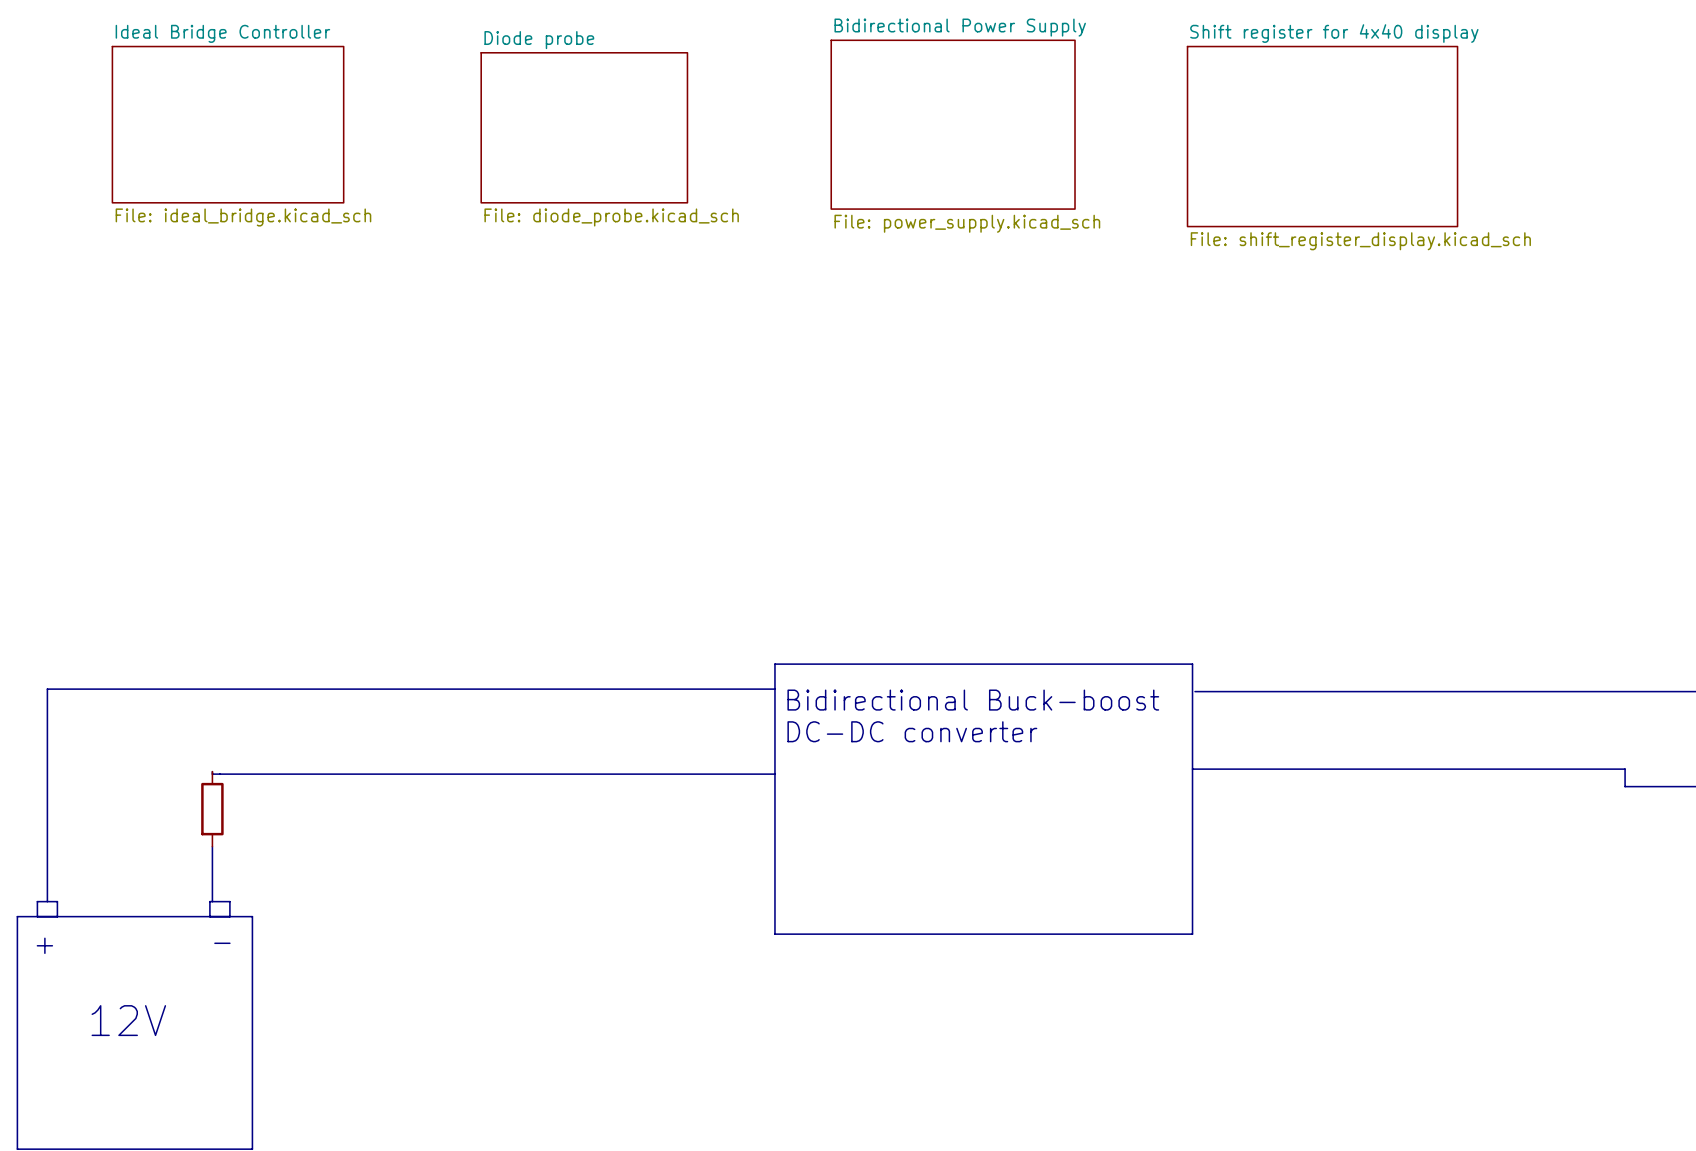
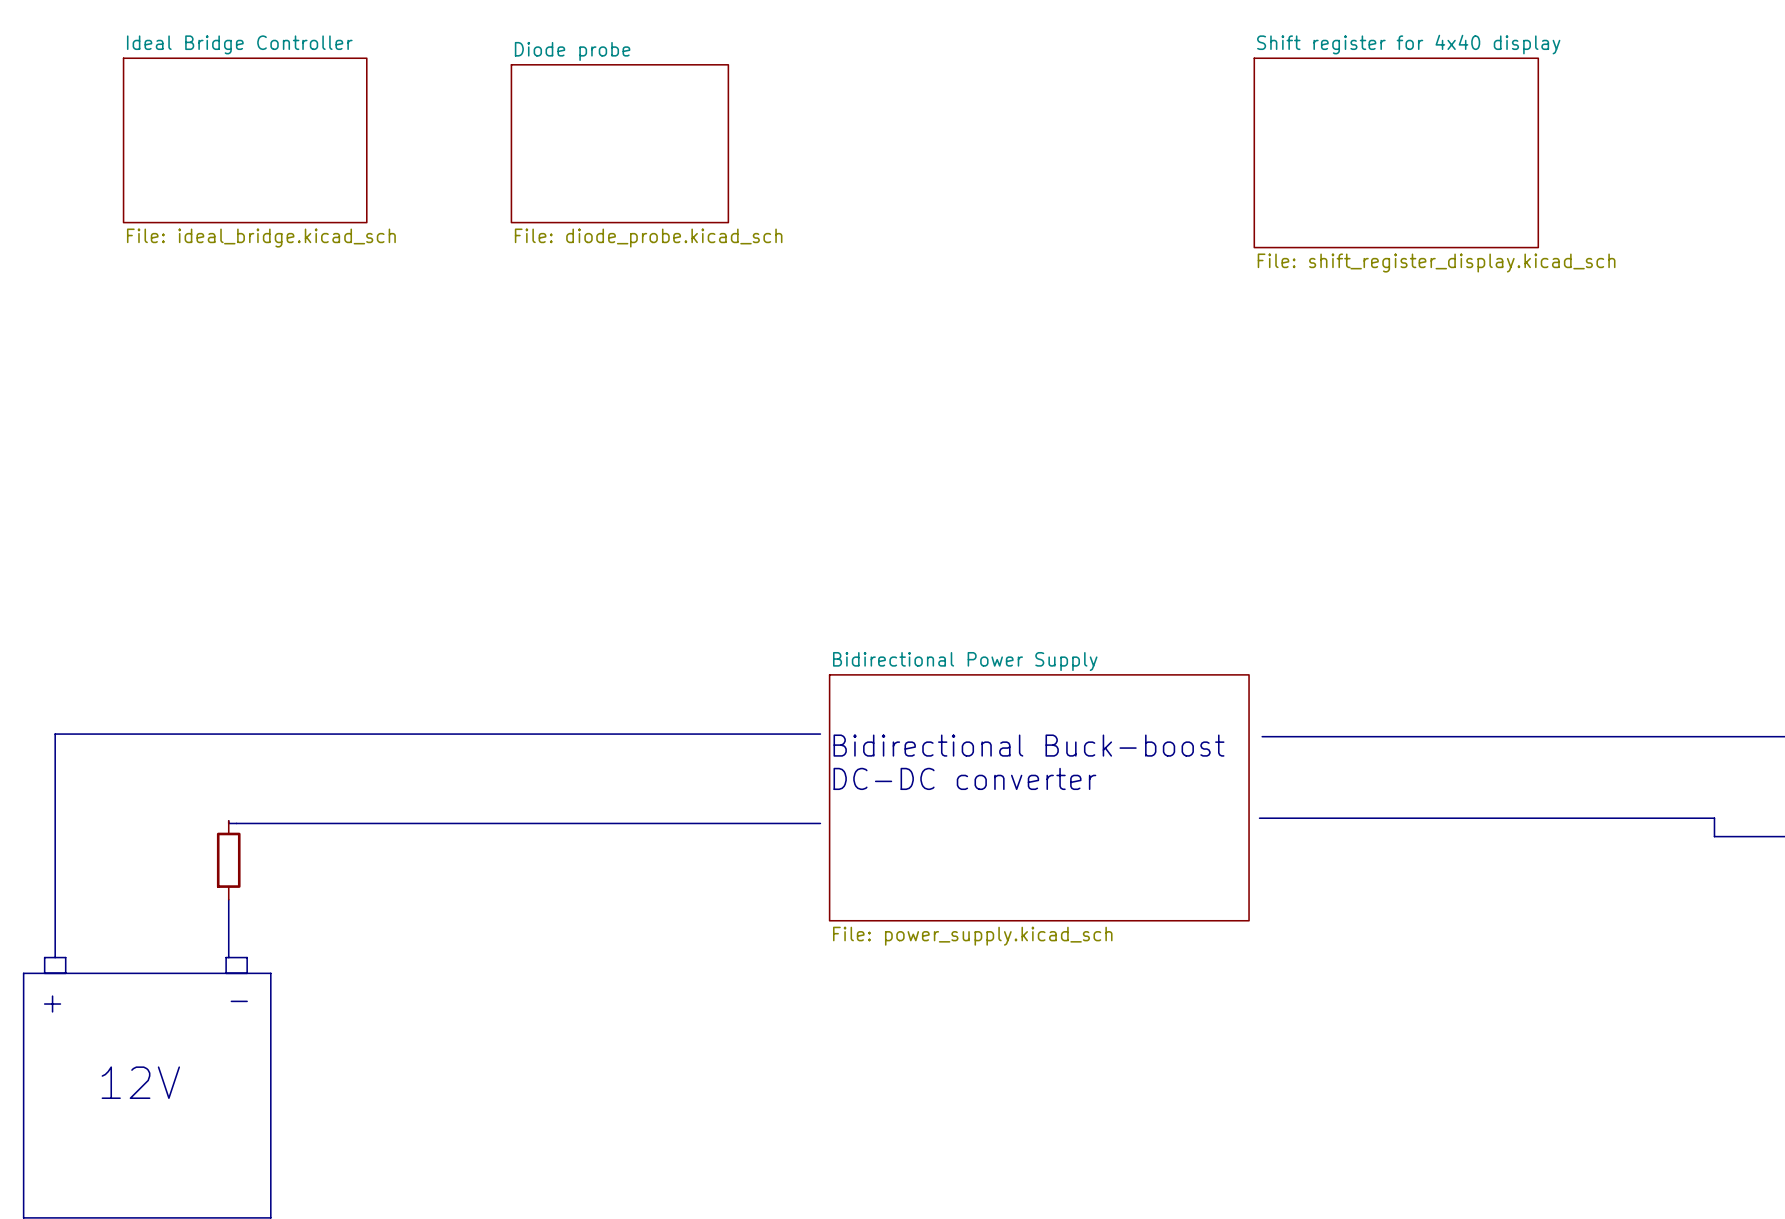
sheet Bidirectional Power Supply: File: power_supply.kicad_sch (953, 124) -> none
line: (774, 664) (1192, 664) (1192, 934) (774, 934) (774, 664) -> none
sheet Bidirectional Power Supply: none -> File: power_supply.kicad_sch (1039, 797)

